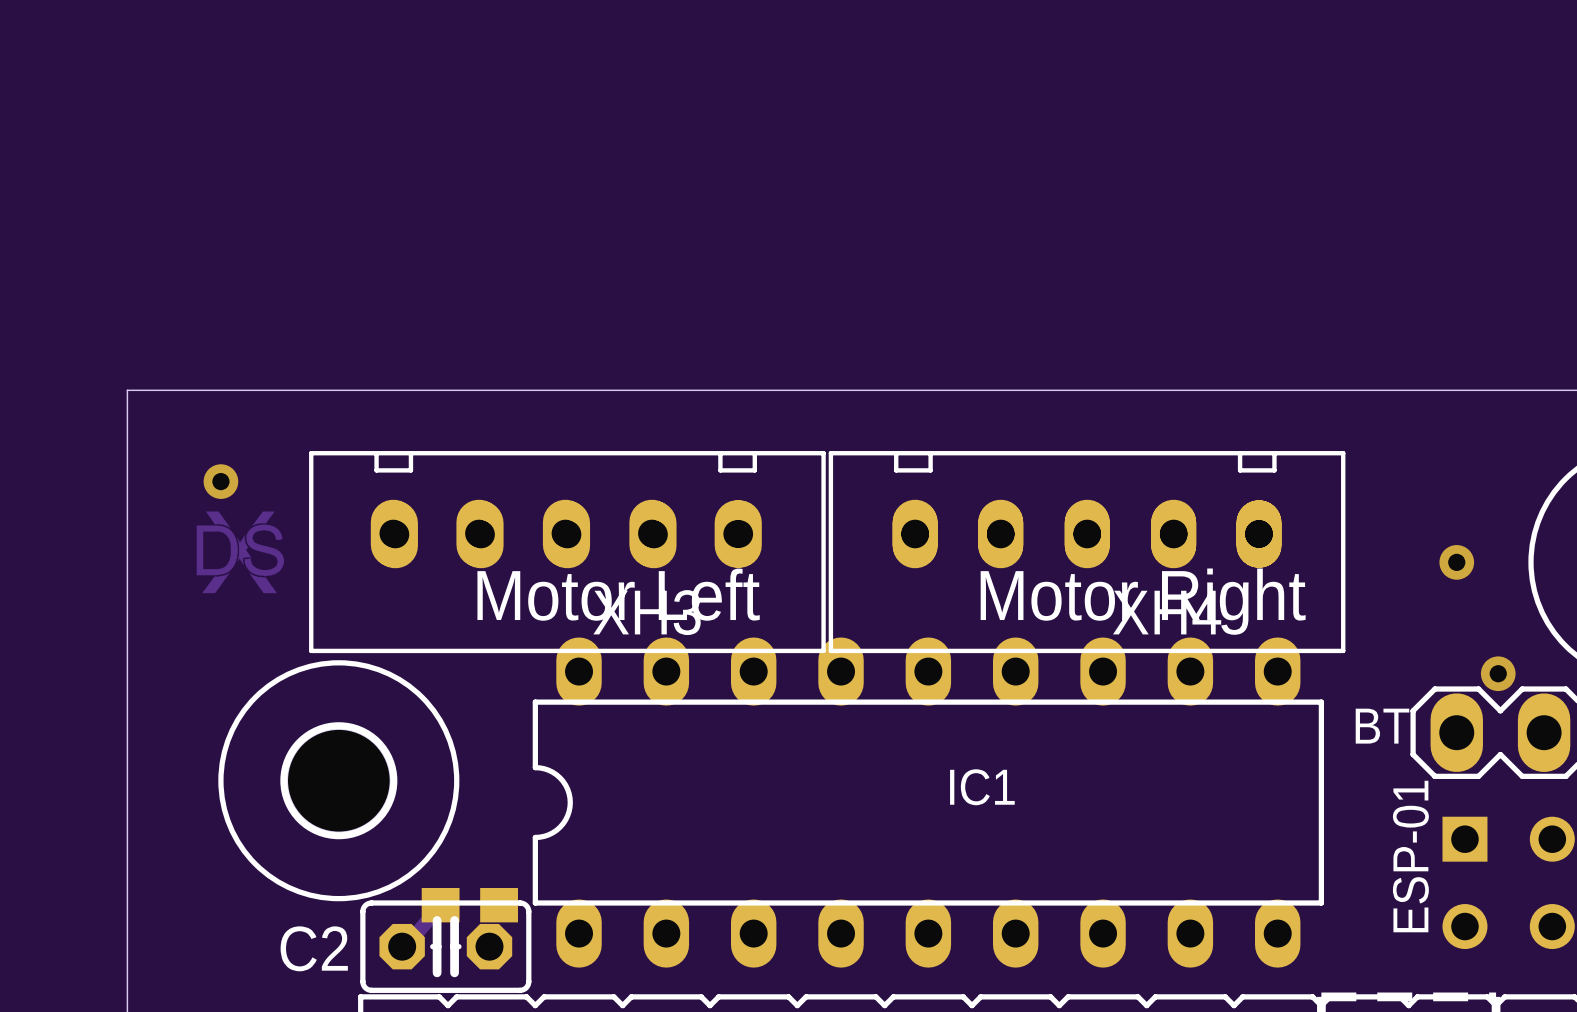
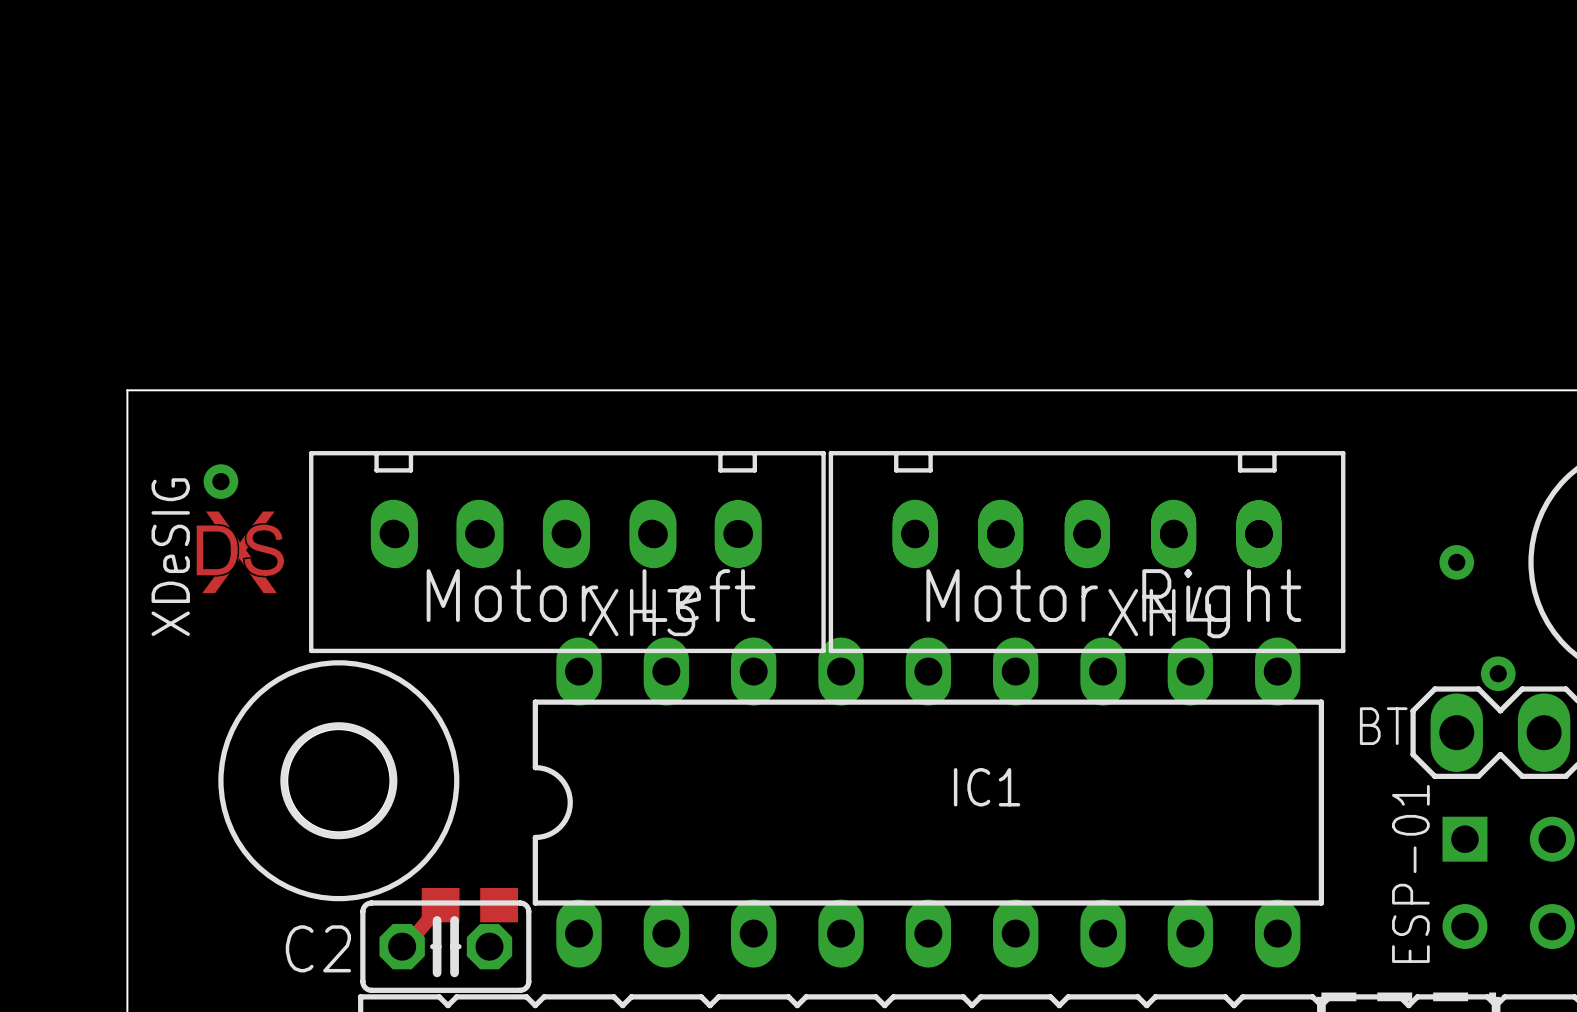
text: none -> XDeSIG (170, 557)

